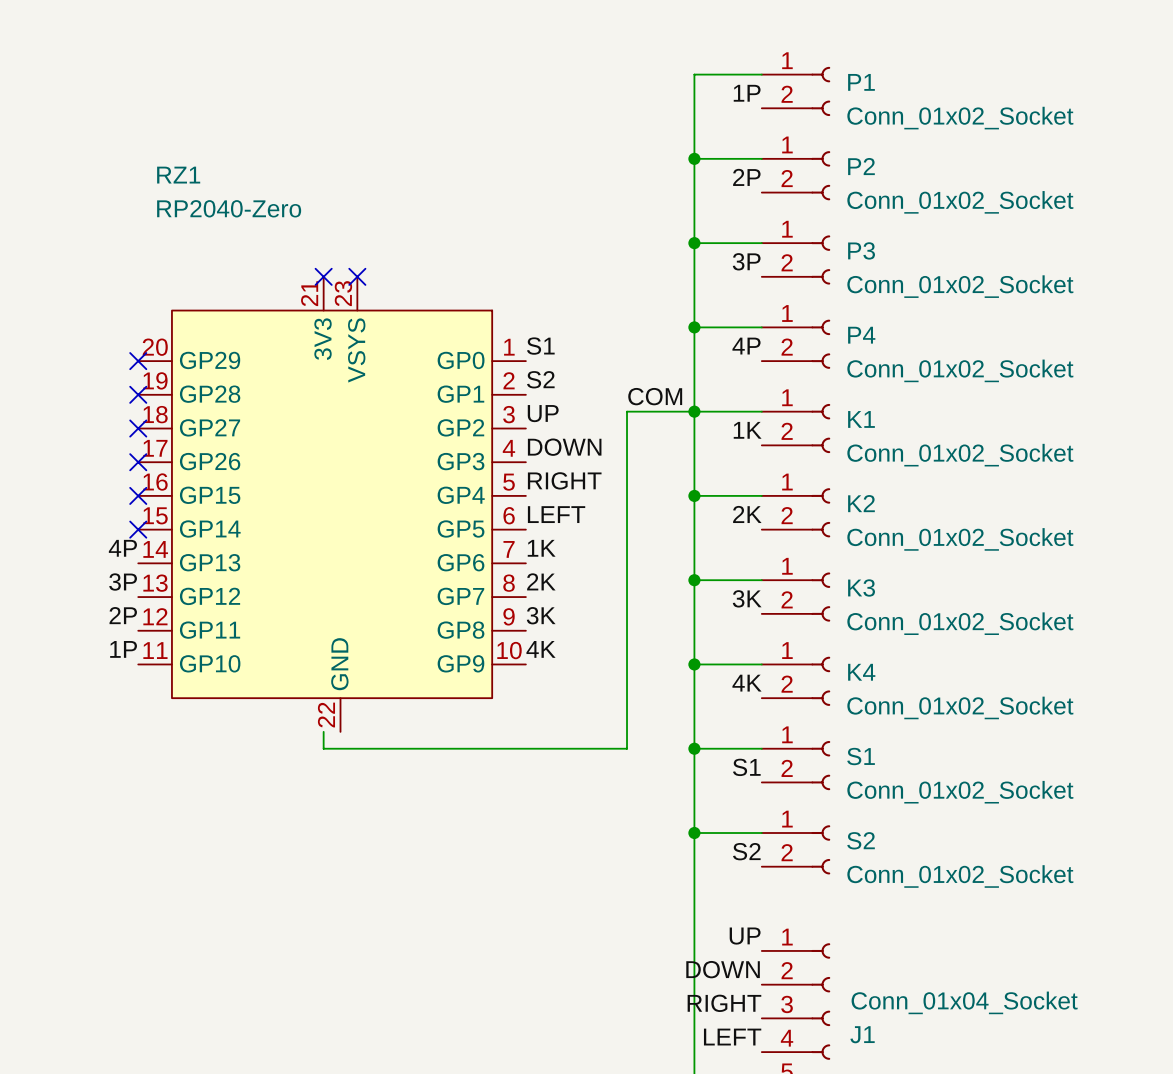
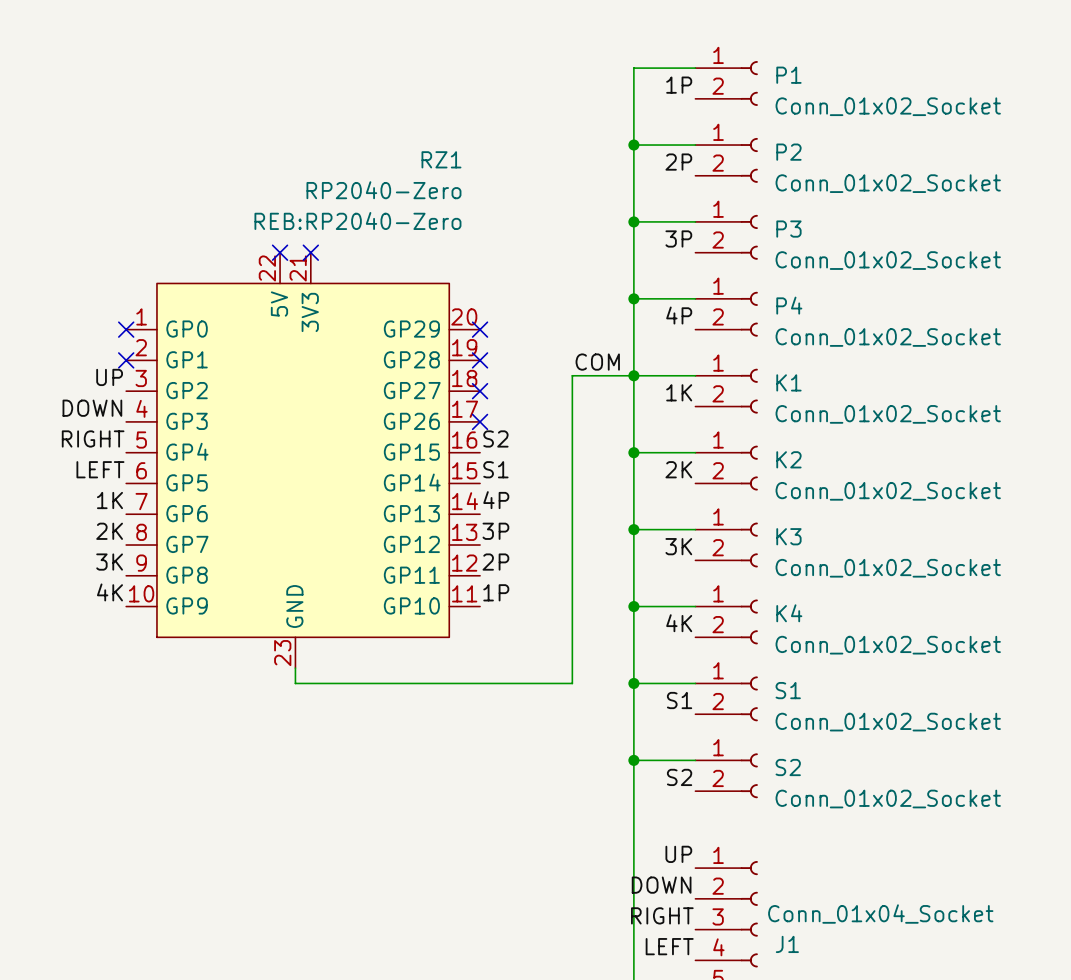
RZ1 name position: RZ1 (178, 175) -> RZ1 (441, 159)
RZ1 value position: RP2040-Zero (229, 208) -> RP2040-Zero (383, 190)
RZ1 text: none -> REB:RP2040-Zero (357, 220)
RZ1 symbol: [138, 276, 526, 732] -> [126, 252, 481, 669]
no-connect mark: none -> (280, 252)
no-connect mark: (323, 276) -> none
no-connect mark: none -> (310, 252)
no-connect mark: (357, 276) -> none
label: S1 (540, 346) -> none
no-connect mark: none -> (480, 329)
label: S2 (540, 379) -> none
no-connect mark: none -> (480, 360)
label: none -> UP (109, 377)
label: UP (543, 413) -> none
no-connect mark: (138, 428) -> none
no-connect mark: none -> (480, 391)
label: none -> DOWN (92, 408)
label: DOWN (564, 447) -> none
no-connect mark: (138, 462) -> none
no-connect mark: none -> (480, 421)
label: none -> RIGHT (93, 438)
label: RIGHT (564, 480) -> S2 (495, 438)
no-connect mark: (138, 495) -> none
label: none -> LEFT (100, 469)
label: LEFT (556, 514) -> S1 (495, 469)
no-connect mark: (138, 529) -> none
label: 4P (122, 548) -> 1K (109, 500)
label: 1K (541, 548) -> 4P (496, 500)
label: 2K (541, 581) -> 3P (495, 531)
label: 3P (123, 582) -> 2K (109, 531)
label: 2P (123, 615) -> 3K (109, 562)
label: 3K (541, 615) -> 2P (495, 562)
label: 1P (123, 649) -> 4K (109, 592)
label: 4K (541, 649) -> 1P (496, 592)

